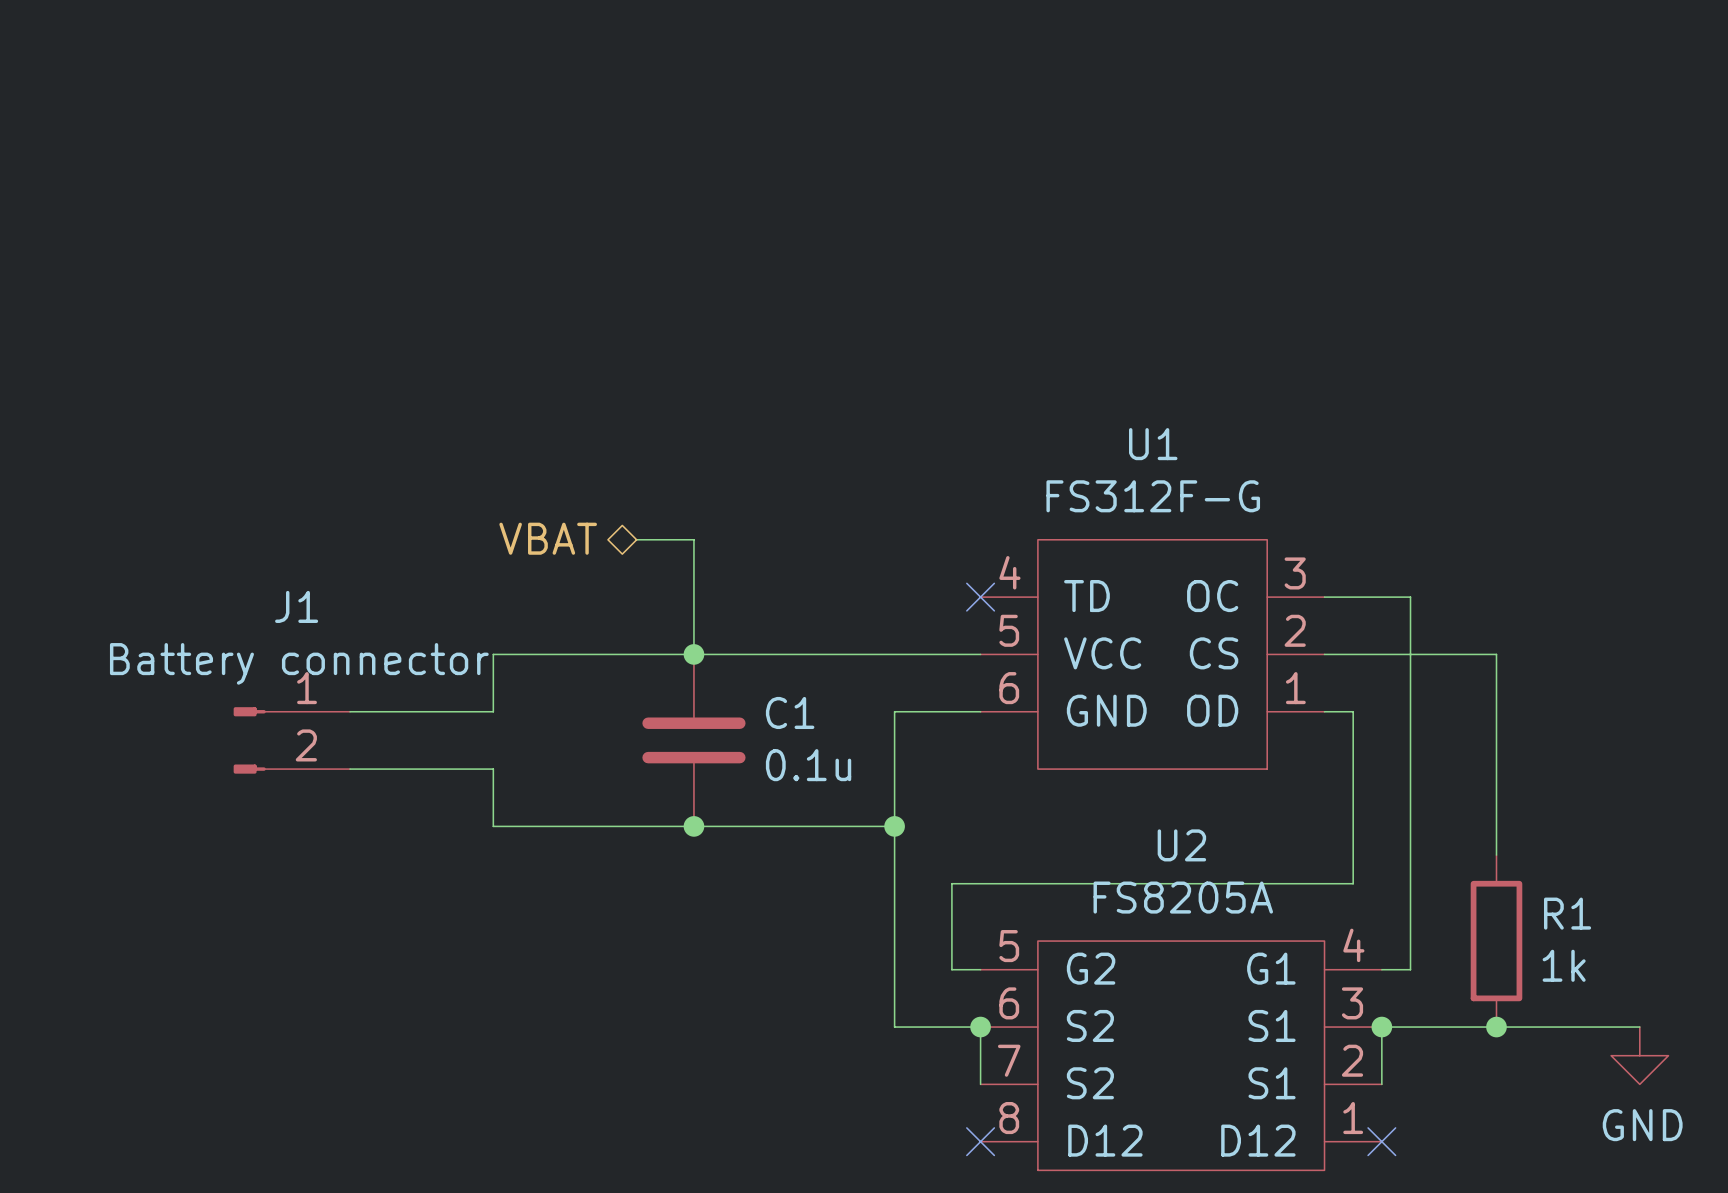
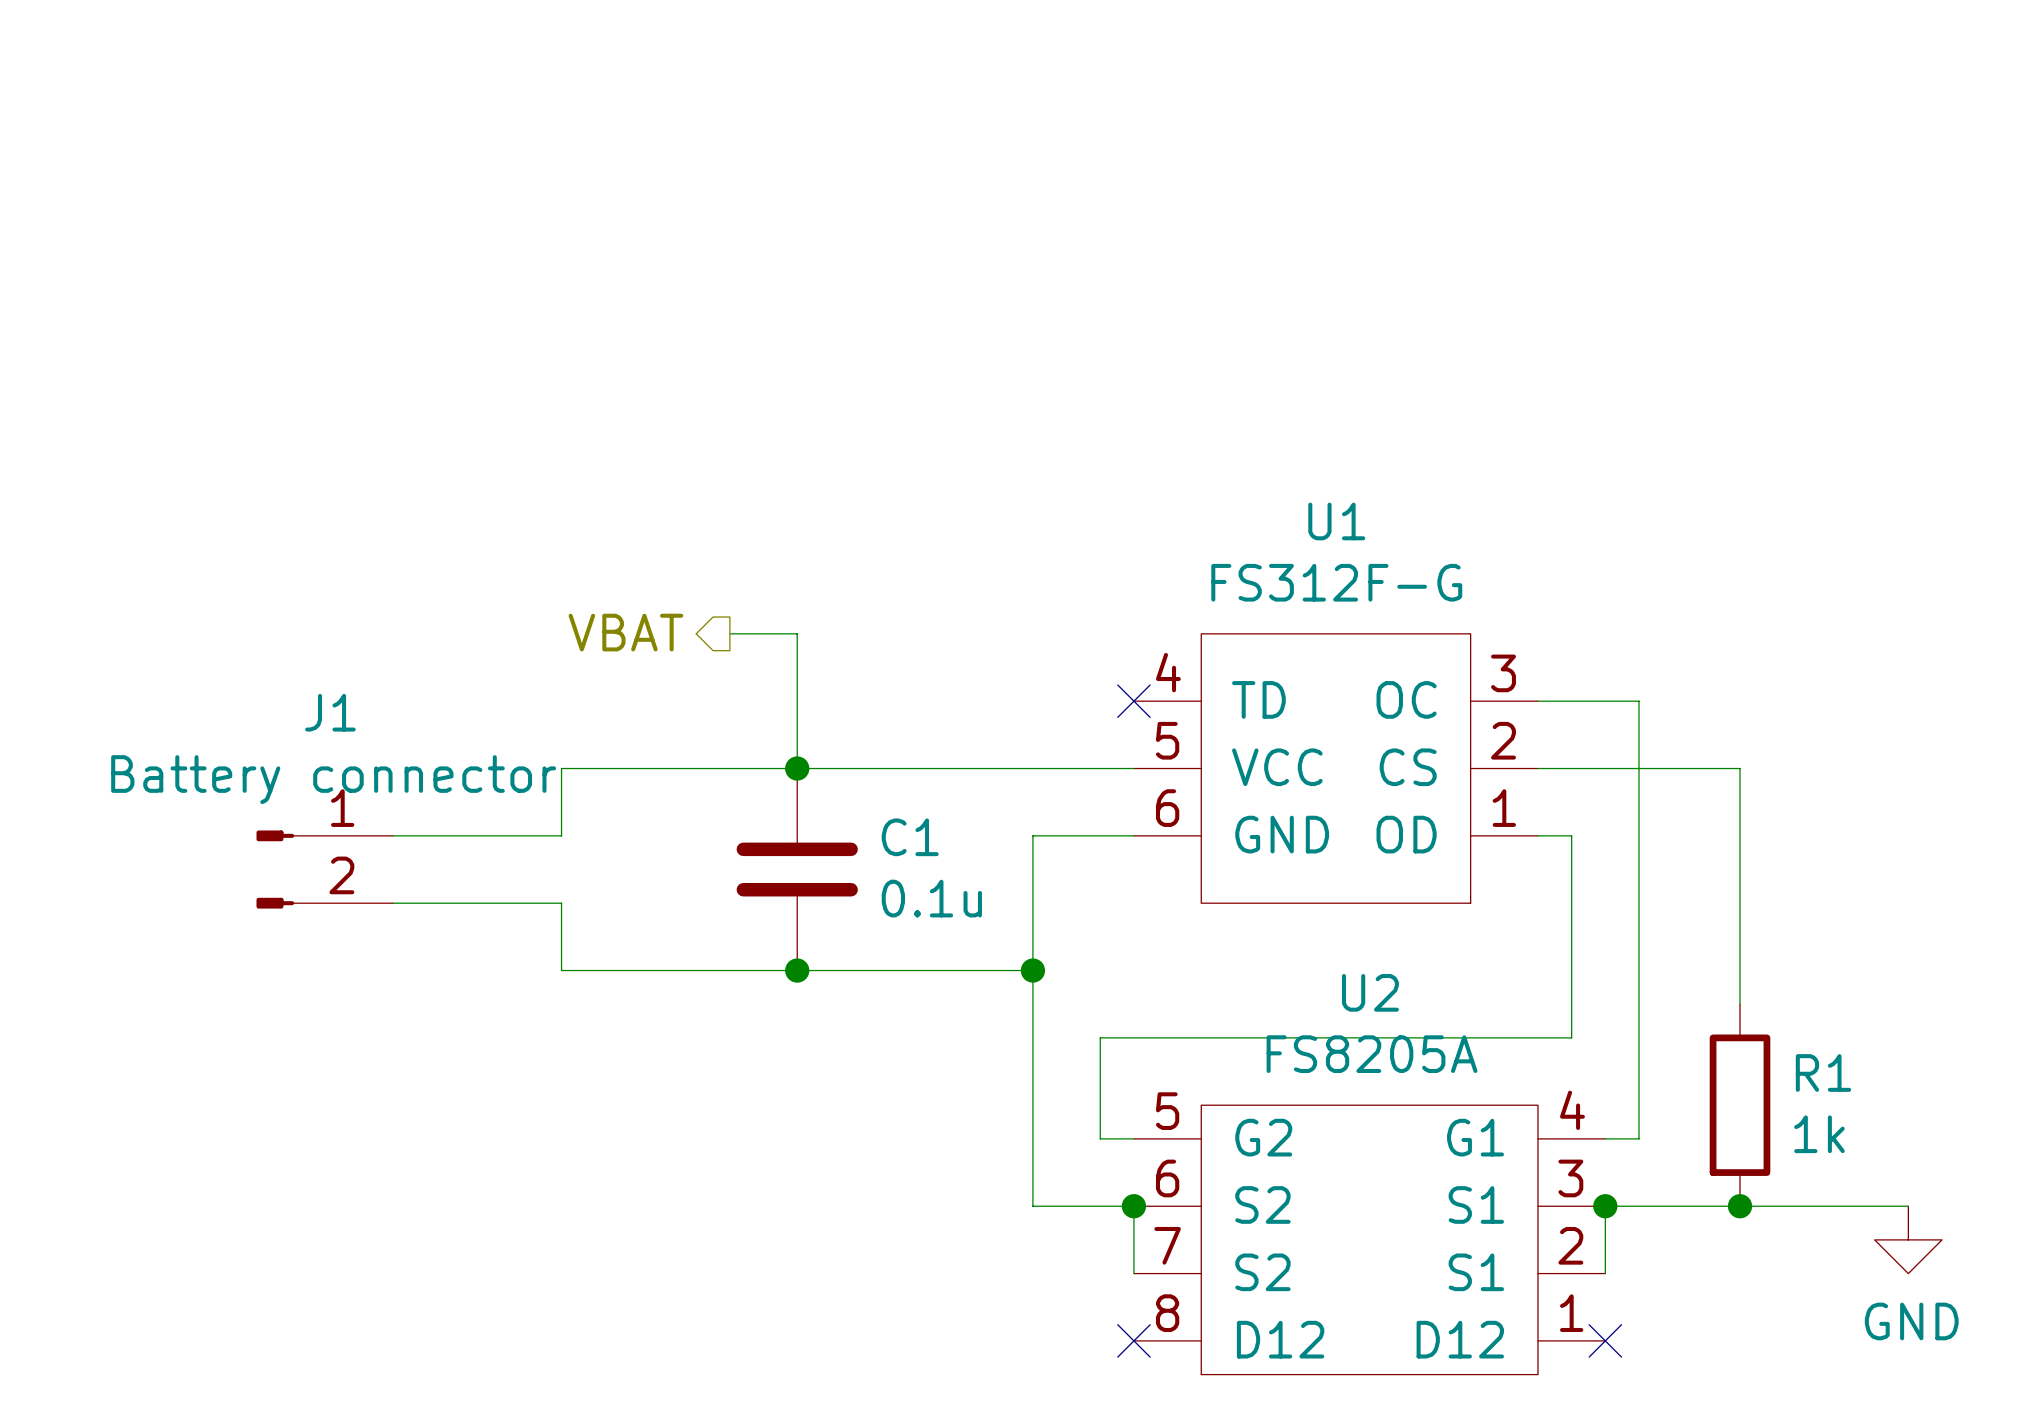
hierarchical label shape: bidirectional (548, 538) -> output (625, 632)

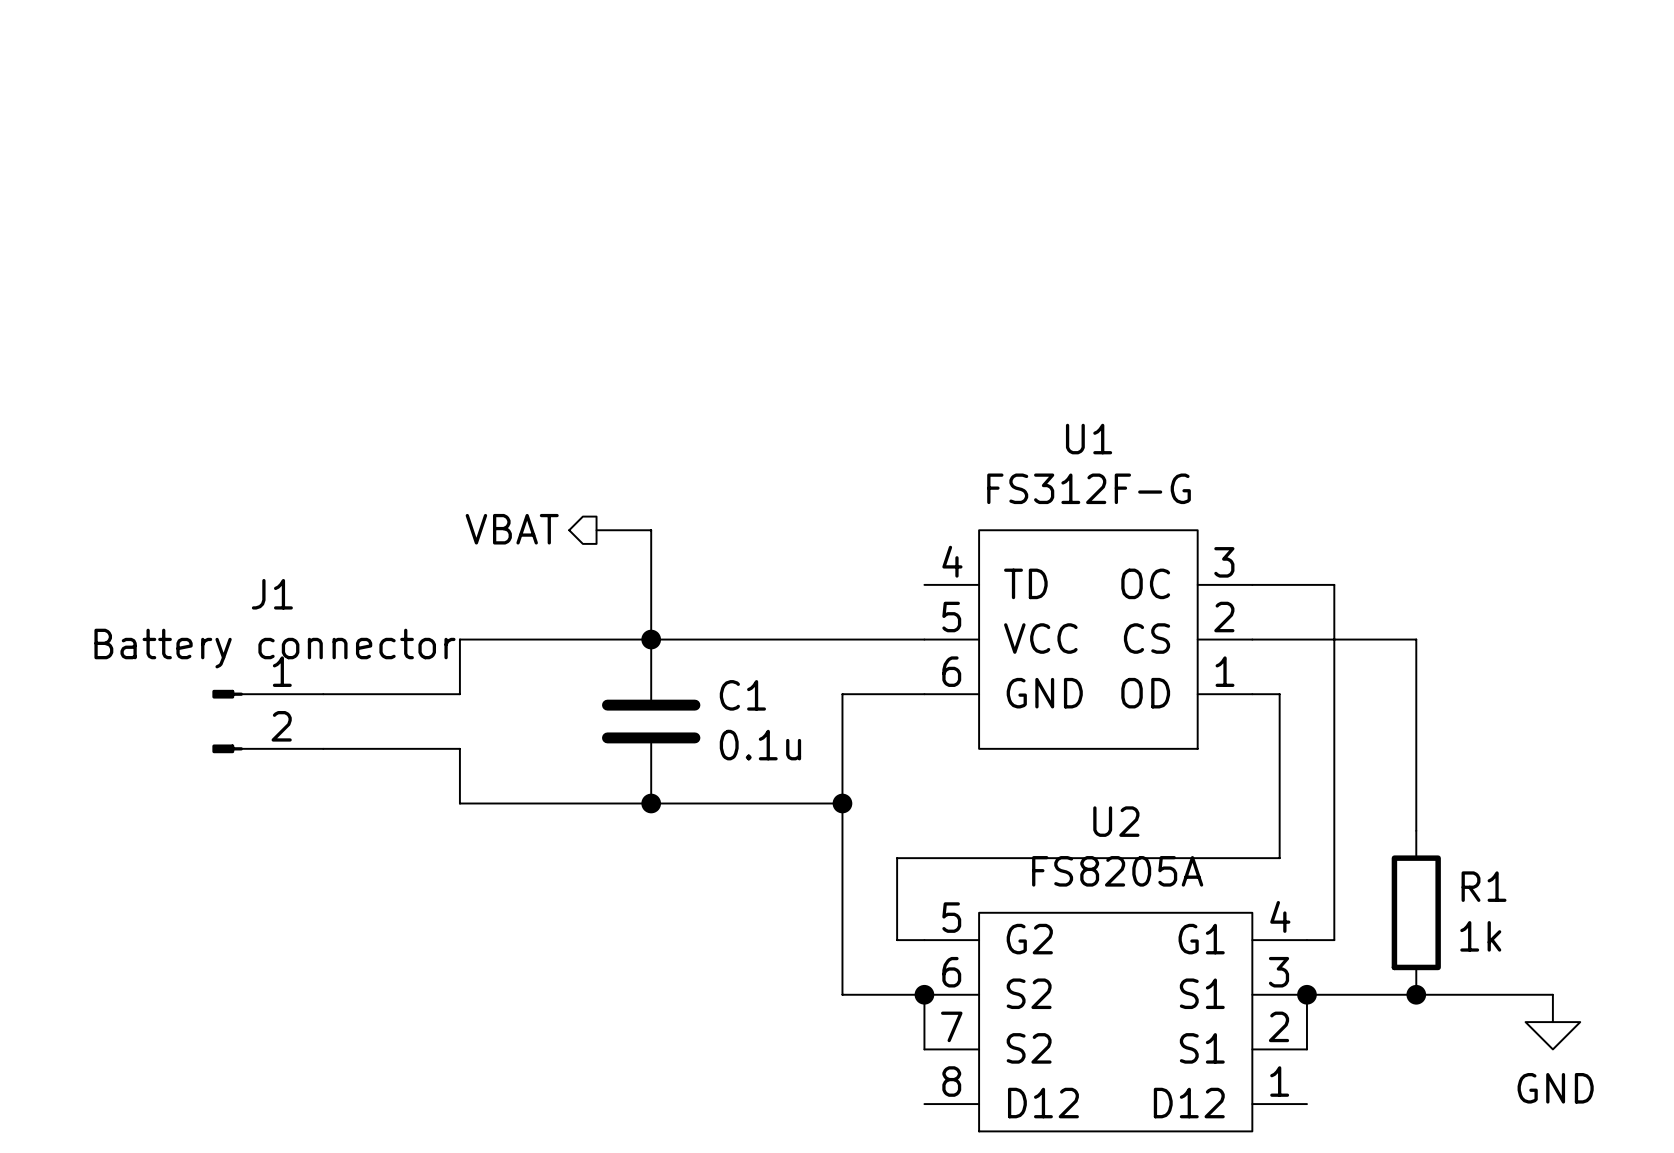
no-connect mark: (1133, 701) -> none
no-connect mark: (1133, 1340) -> none
no-connect mark: (1605, 1340) -> none

